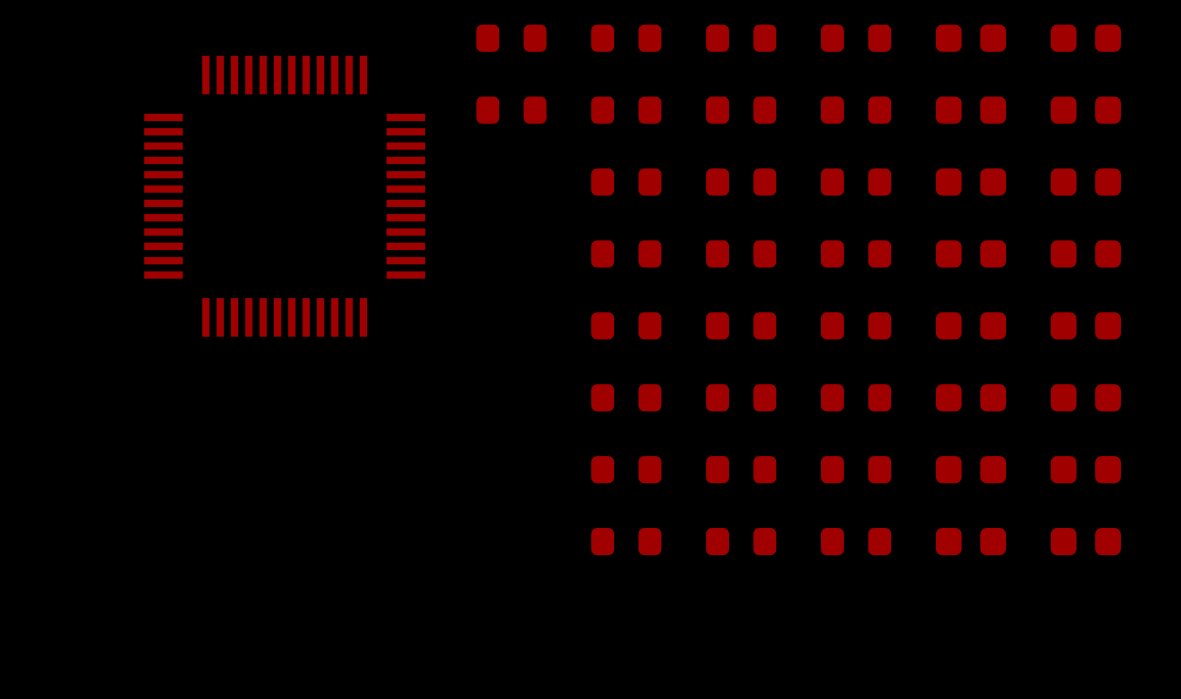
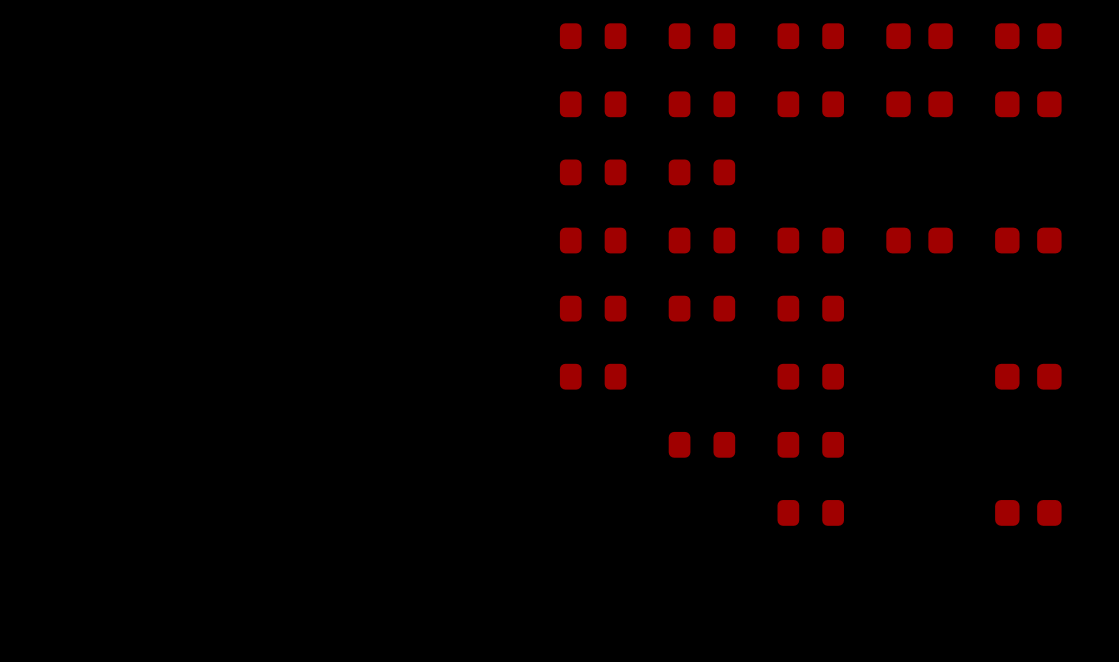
part: (511, 38) -> none
part: (511, 110) -> none
part: (856, 182) -> none
part: (970, 182) -> none
part: (1085, 182) -> none
part: (284, 196) -> none
part: (970, 325) -> none
part: (1085, 325) -> none
part: (741, 397) -> none
part: (970, 397) -> none
part: (626, 469) -> none
part: (970, 469) -> none
part: (1085, 469) -> none
part: (626, 541) -> none
part: (741, 541) -> none
part: (970, 541) -> none

